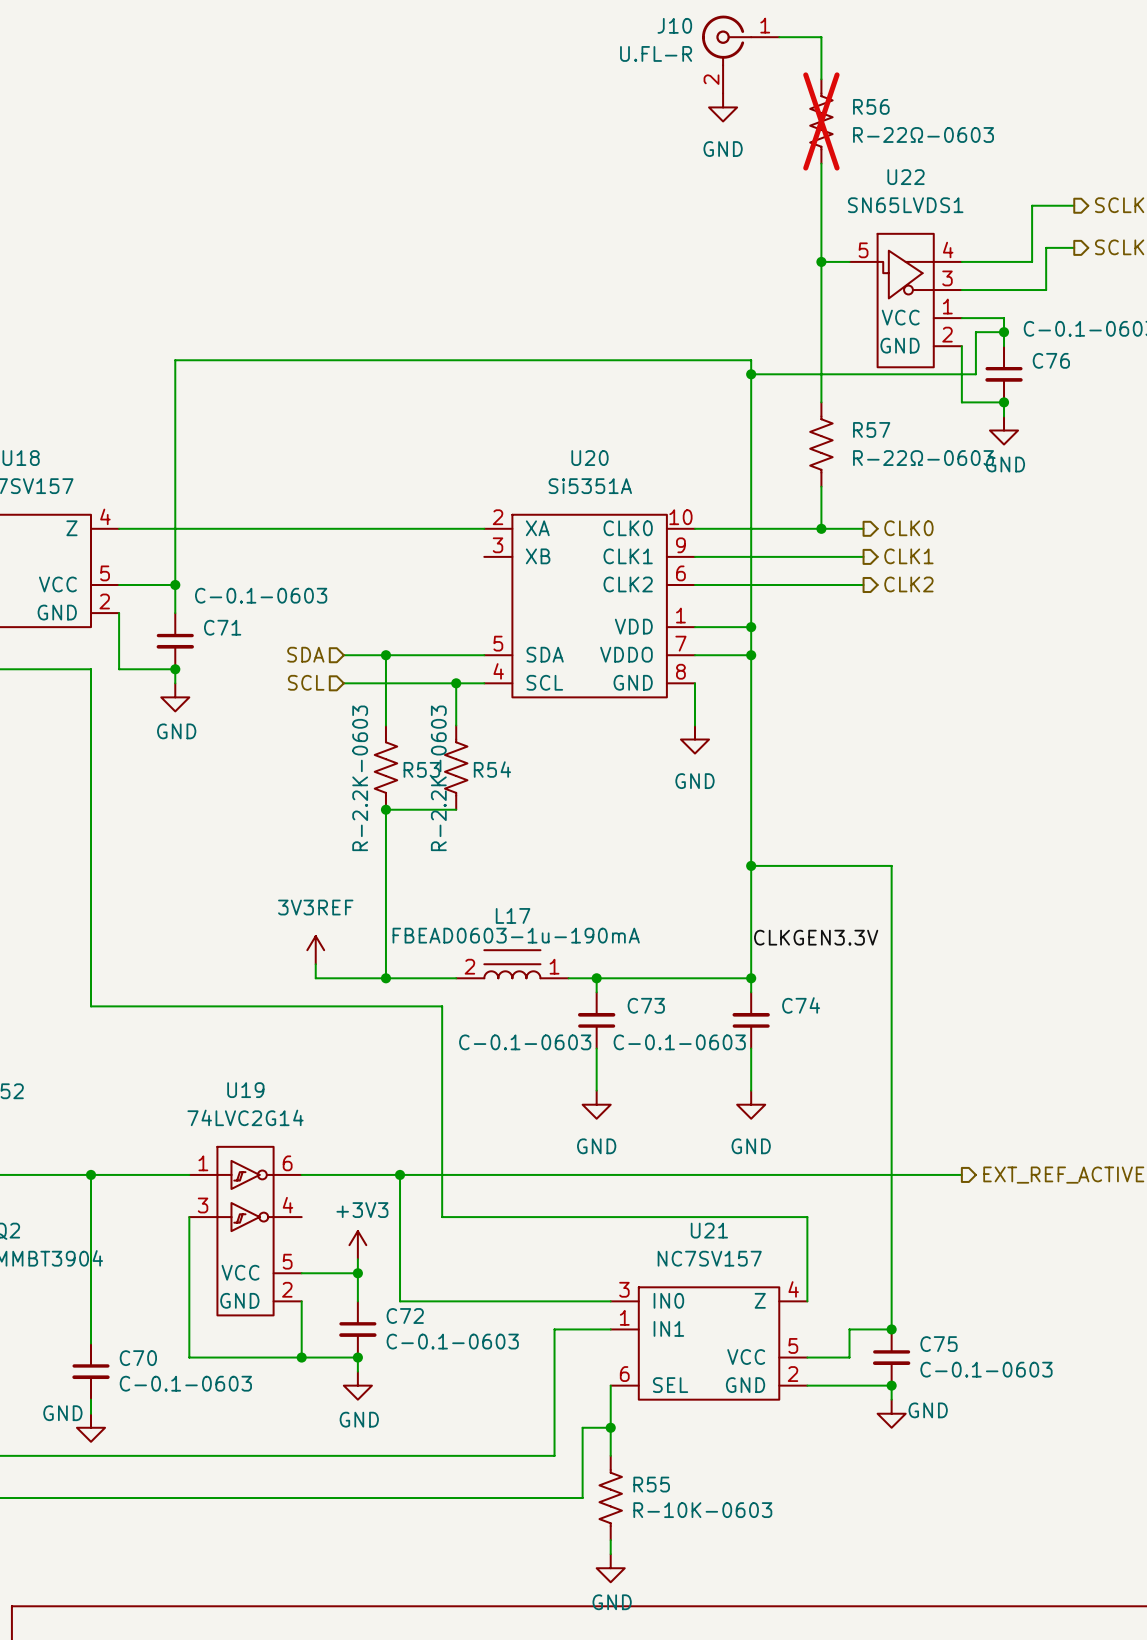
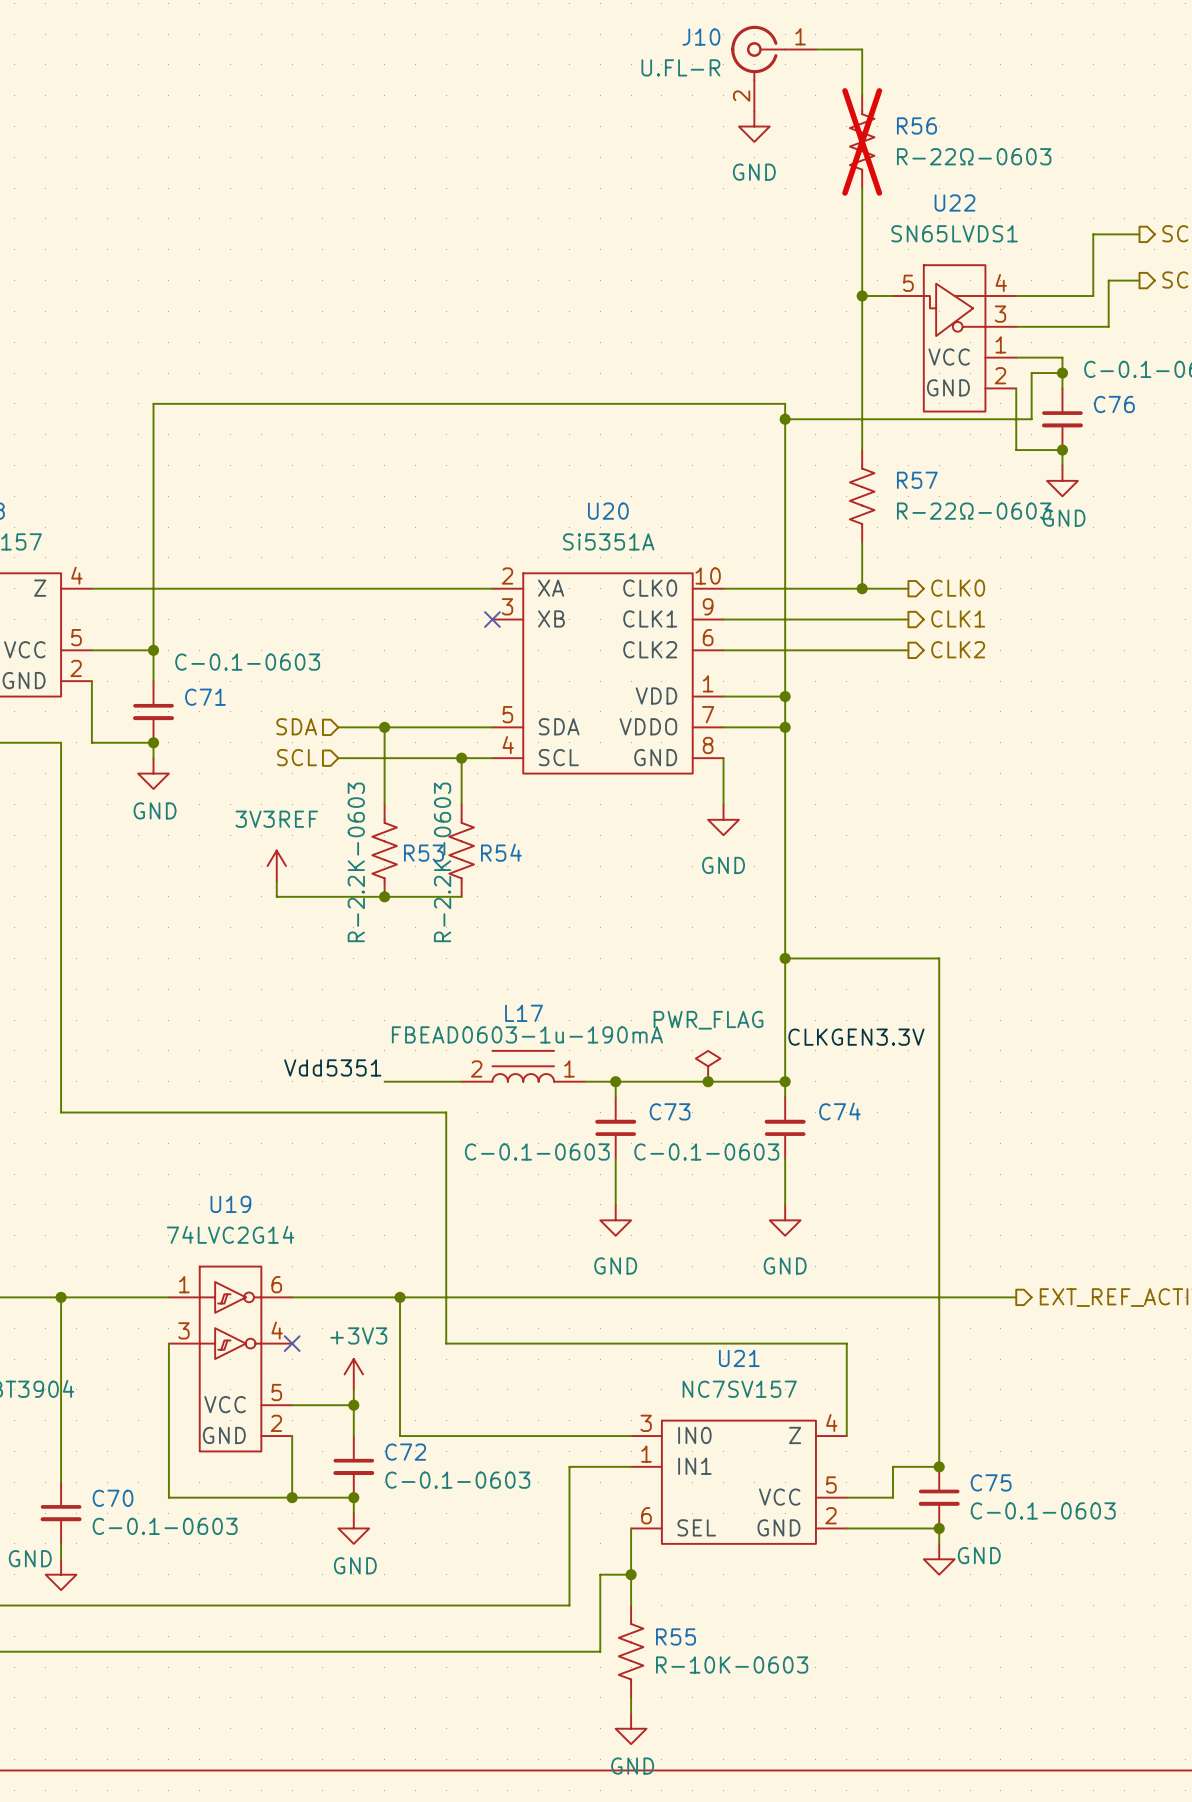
no-connect mark: none -> (492, 619)
wire: (385, 809) (385, 978) (315, 978) (315, 964) -> (384, 896) (276, 896) (276, 881)
power symbol position: 3V3REF (315, 950) -> 3V3REF (276, 866)
power symbol: none -> PWR_FLAG (708, 1066)
label: none -> Vdd5351 (332, 1067)
junction: (385, 978) -> none
junction: none -> (708, 1081)
no-connect mark: none -> (292, 1343)

